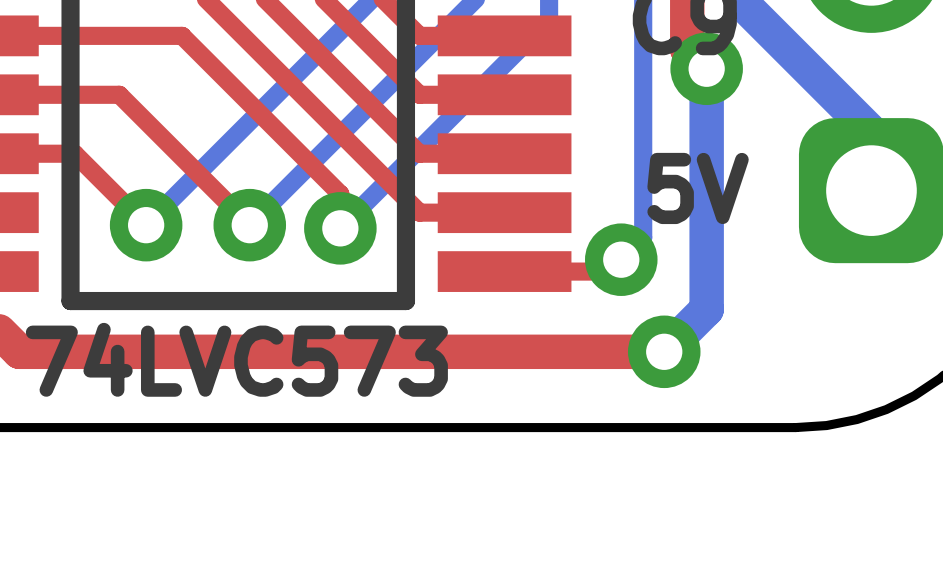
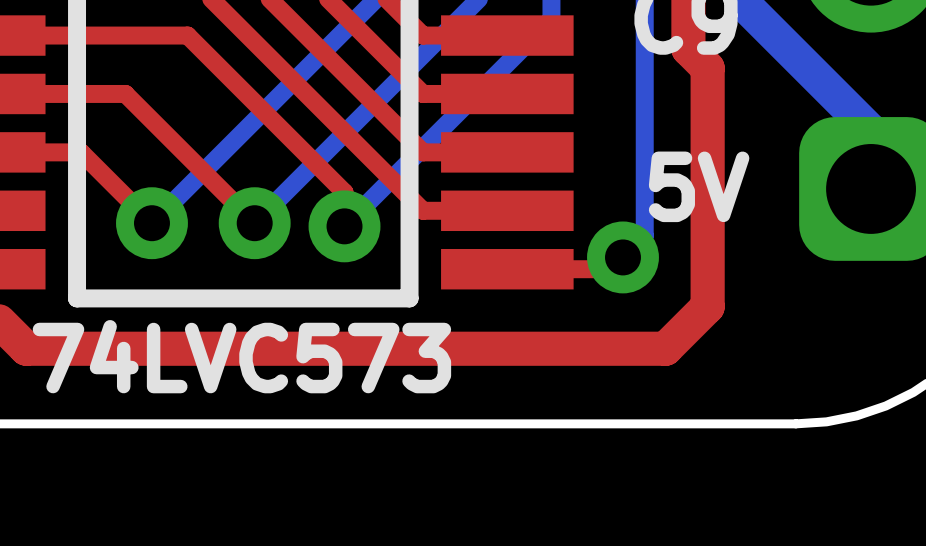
top track: none -> (707, 68) (707, 306) (665, 348)
bottom track: (706, 68) (706, 309) (664, 351) -> none
via: (706, 68) -> none
via: (664, 351) -> none

